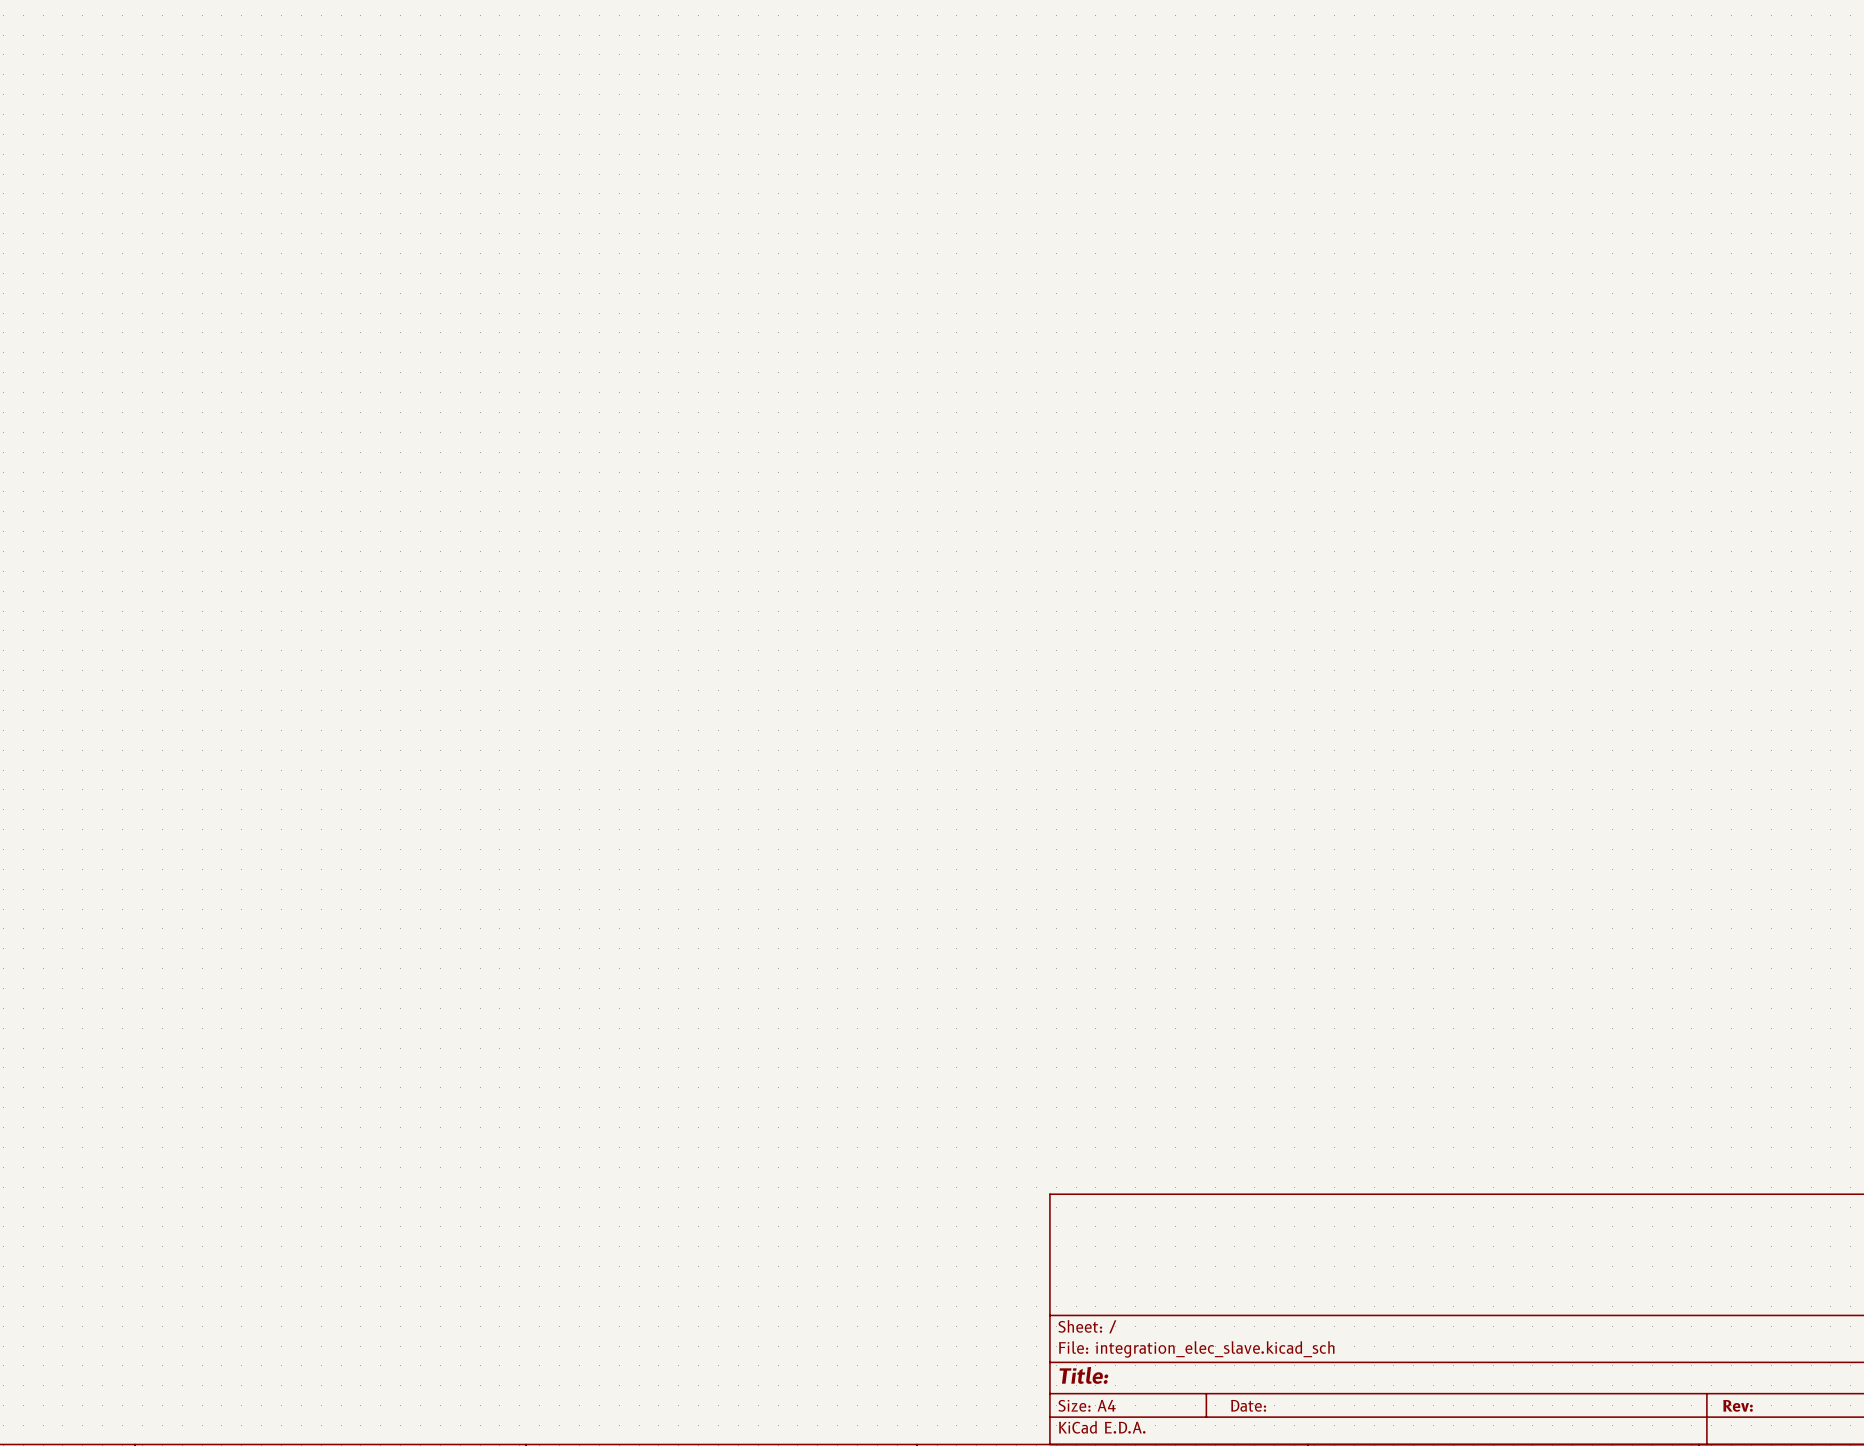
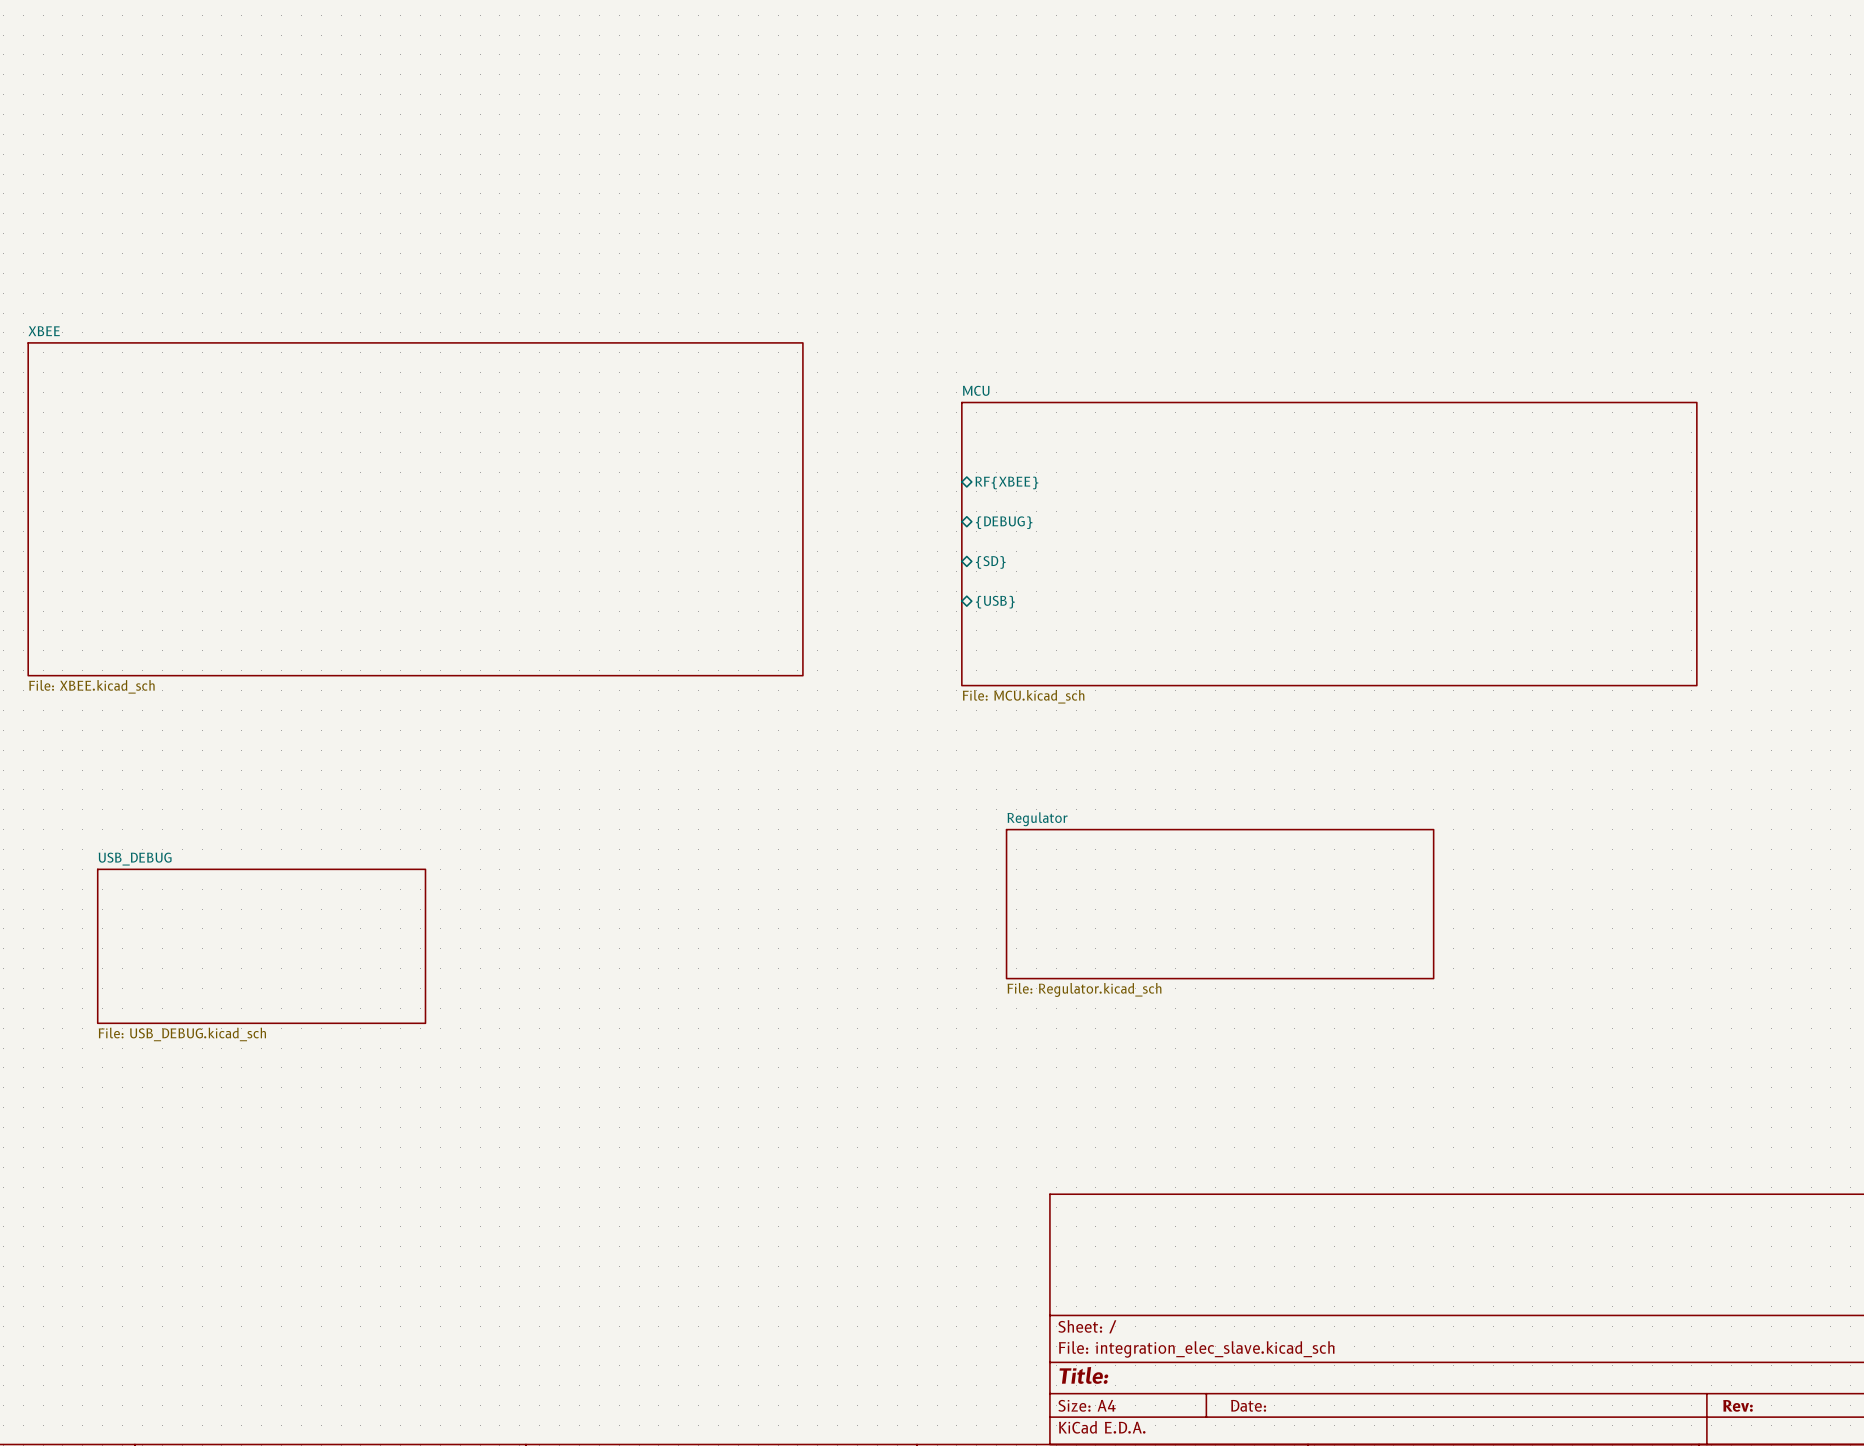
sheet pin: none -> RF{XBEE} (1006, 482)
sheet XBEE: none -> File: XBEE.kicad_sch (415, 509)
sheet pin: none -> {DEBUG} (1004, 522)
sheet MCU: none -> File: MCU.kicad_sch (1329, 544)
sheet pin: none -> {SD} (990, 562)
sheet pin: none -> {USB} (995, 602)
sheet Regulator: none -> File: Regulator.kicad_sch (1220, 904)
sheet USB_DEBUG: none -> File: USB_DEBUG.kicad_sch (261, 946)

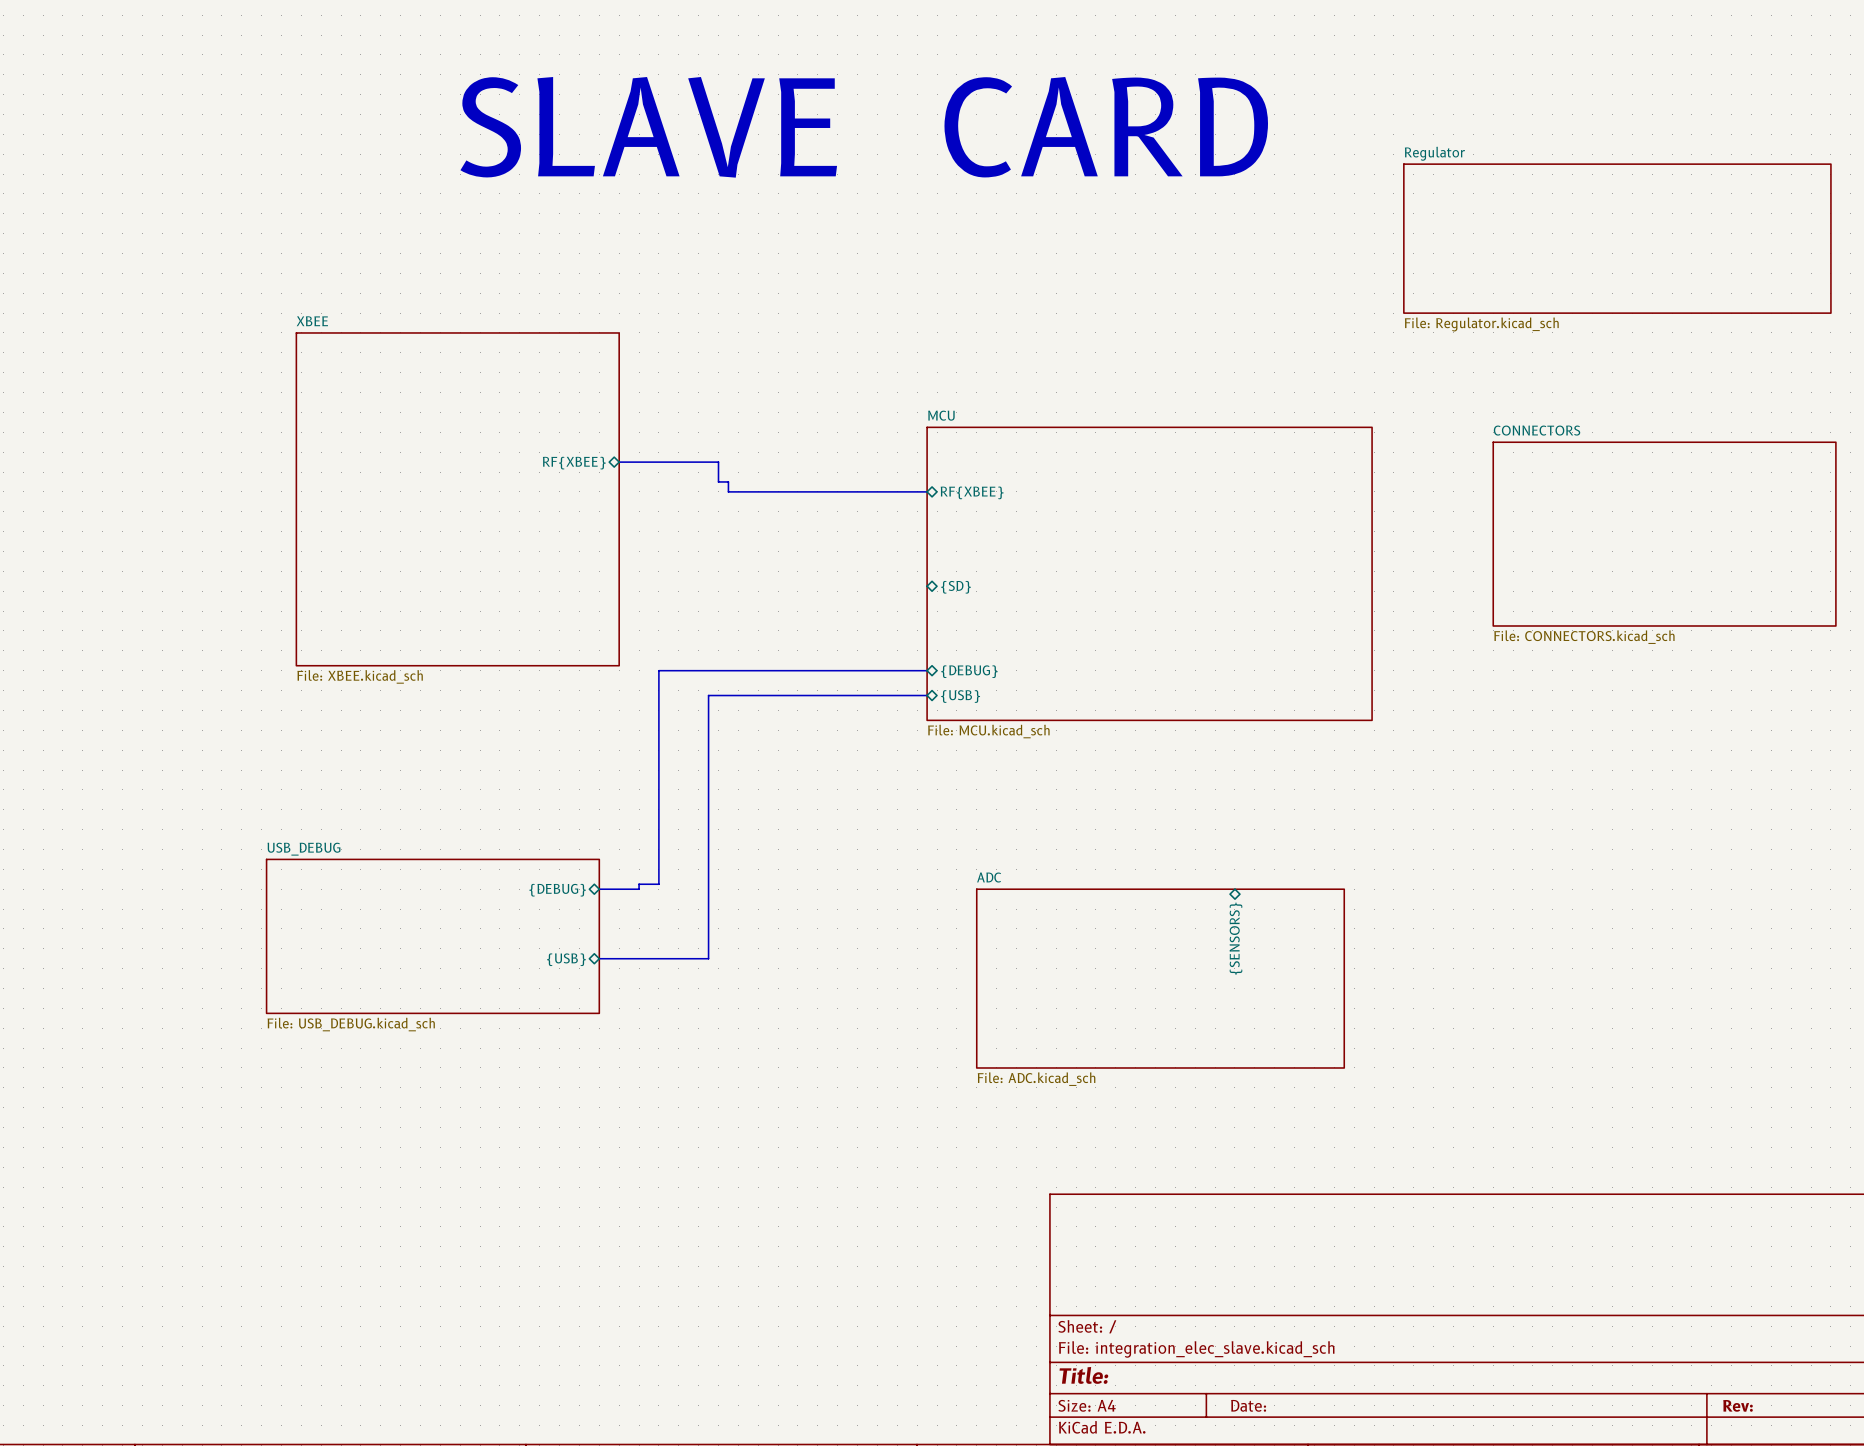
text: none -> SLAVE CARD (864, 127)
sheet Regulator: none -> File: Regulator.kicad_sch (1617, 238)
bus: none -> (619, 462) (718, 462) (718, 481) (728, 481) (728, 491) (927, 491)
sheet pin: none -> RF{XBEE} (574, 463)
sheet pin position: RF{XBEE} (1006, 482) -> RF{XBEE} (972, 492)
sheet XBEE: none -> File: XBEE.kicad_sch (457, 499)
sheet XBEE: File: XBEE.kicad_sch (415, 509) -> none
sheet pin position: {DEBUG} (1004, 522) -> {DEBUG} (969, 671)
sheet CONNECTORS: none -> File: CONNECTORS.kicad_sch (1664, 534)
sheet MCU: File: MCU.kicad_sch (1329, 544) -> none
sheet pin position: {SD} (990, 562) -> {SD} (956, 587)
sheet MCU: none -> File: MCU.kicad_sch (1149, 573)
sheet pin position: {USB} (995, 602) -> {USB} (960, 696)
bus: none -> (927, 670) (658, 670) (658, 884) (639, 884) (639, 889) (599, 889)
bus: none -> (927, 695) (708, 695) (708, 958) (599, 958)
sheet pin: none -> {DEBUG} (557, 890)
sheet Regulator: File: Regulator.kicad_sch (1220, 904) -> none
sheet USB_DEBUG: none -> File: USB_DEBUG.kicad_sch (432, 936)
sheet pin: none -> {SENSORS} (1235, 938)
sheet USB_DEBUG: File: USB_DEBUG.kicad_sch (261, 946) -> none
sheet pin: none -> {USB} (566, 959)
sheet ADC: none -> File: ADC.kicad_sch (1160, 978)

